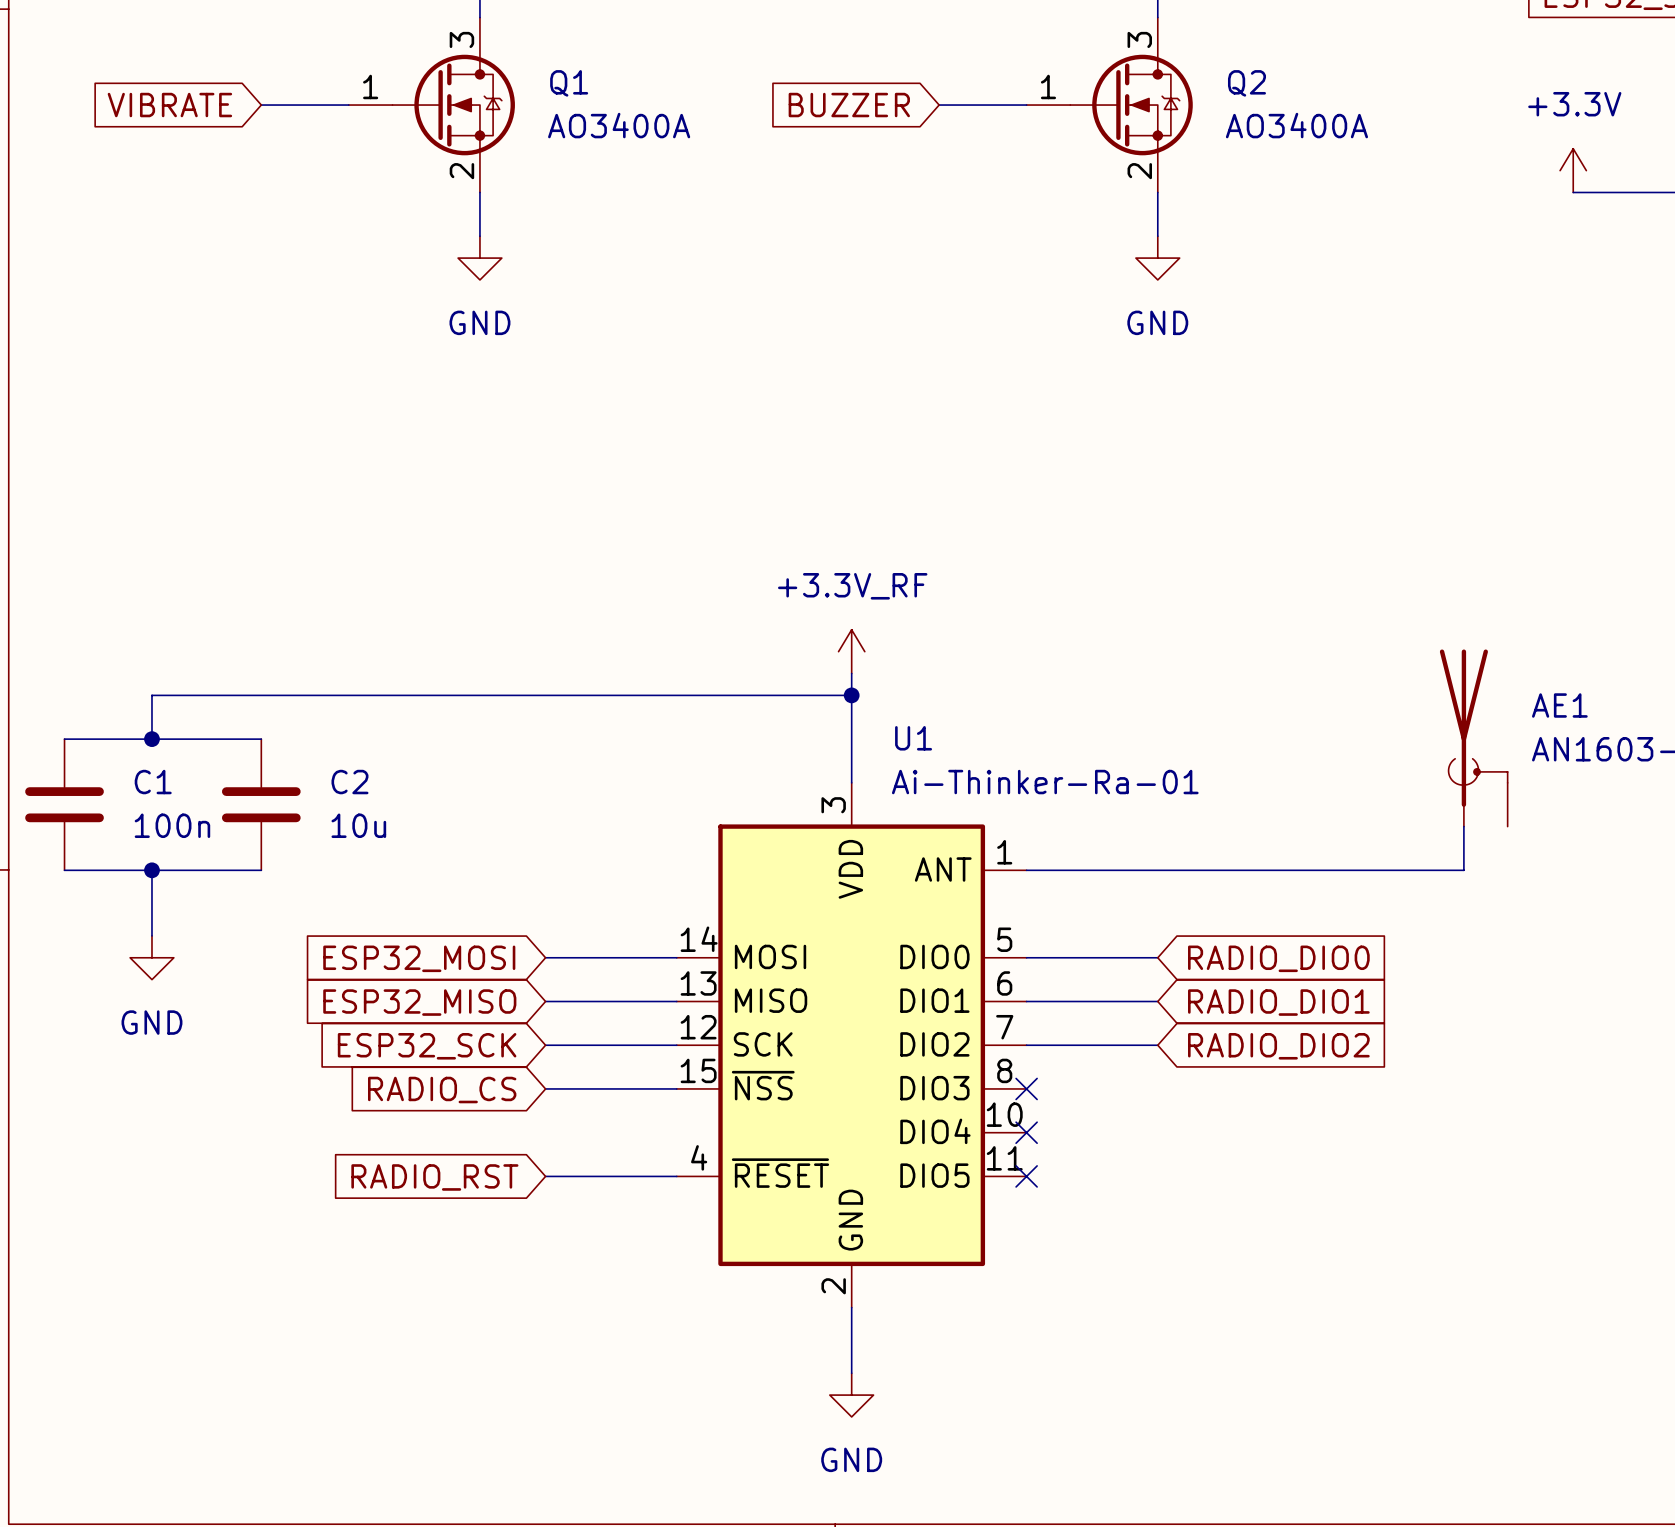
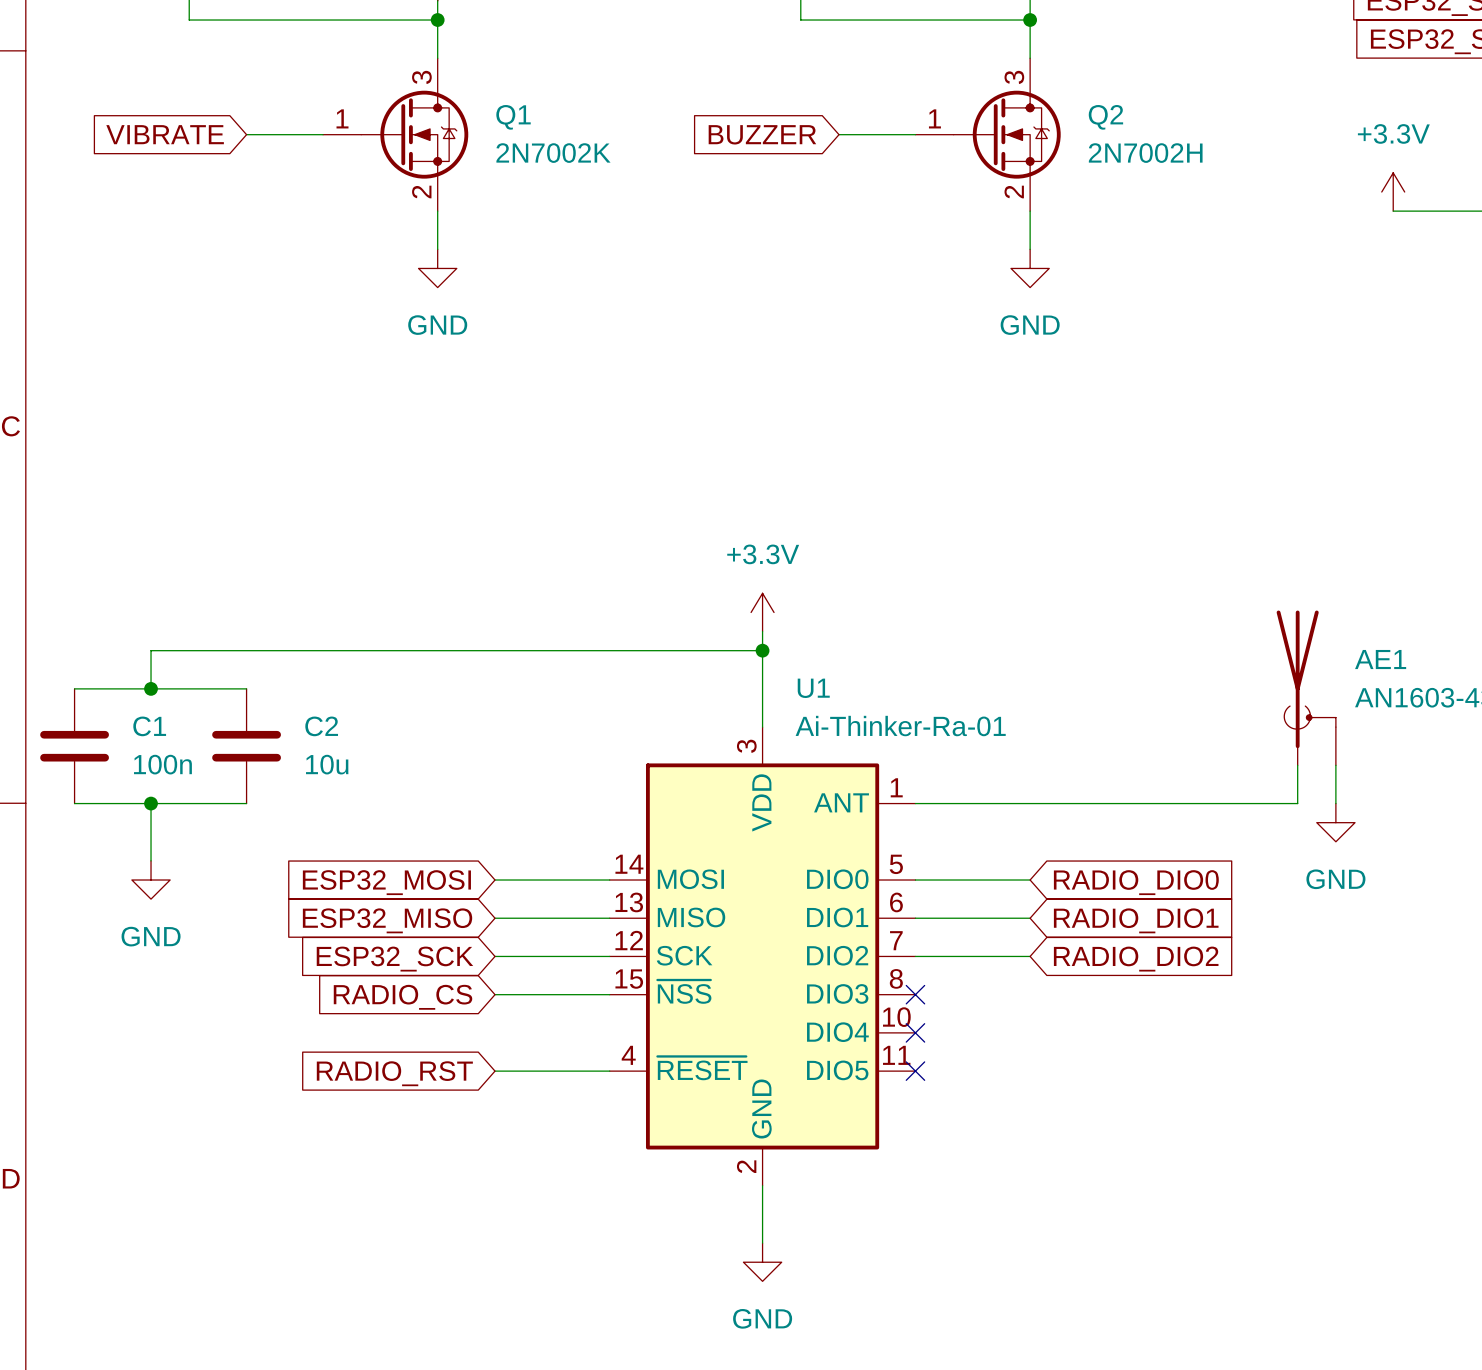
Q1 value: AO3400A (619, 125) -> 2N7002K (553, 153)
Q2 value: AO3400A (1296, 125) -> 2N7002H (1145, 153)
power symbol: +3.3V_RF (851, 651) -> +3.3V (762, 612)
wire: none -> (1335, 765) (1335, 803)
power symbol: none -> GND (1335, 822)

